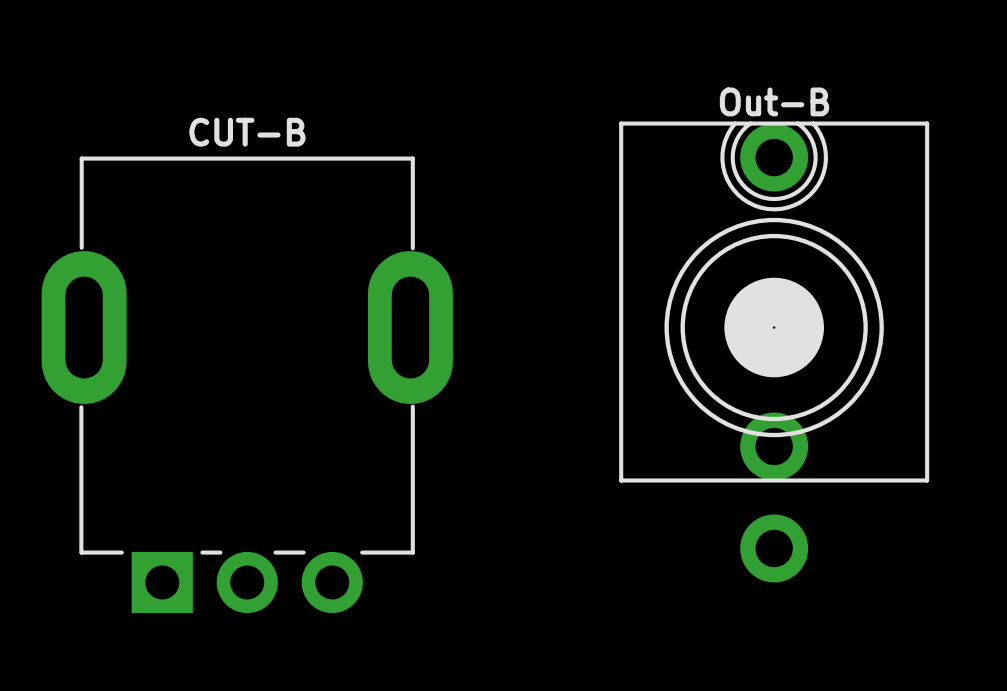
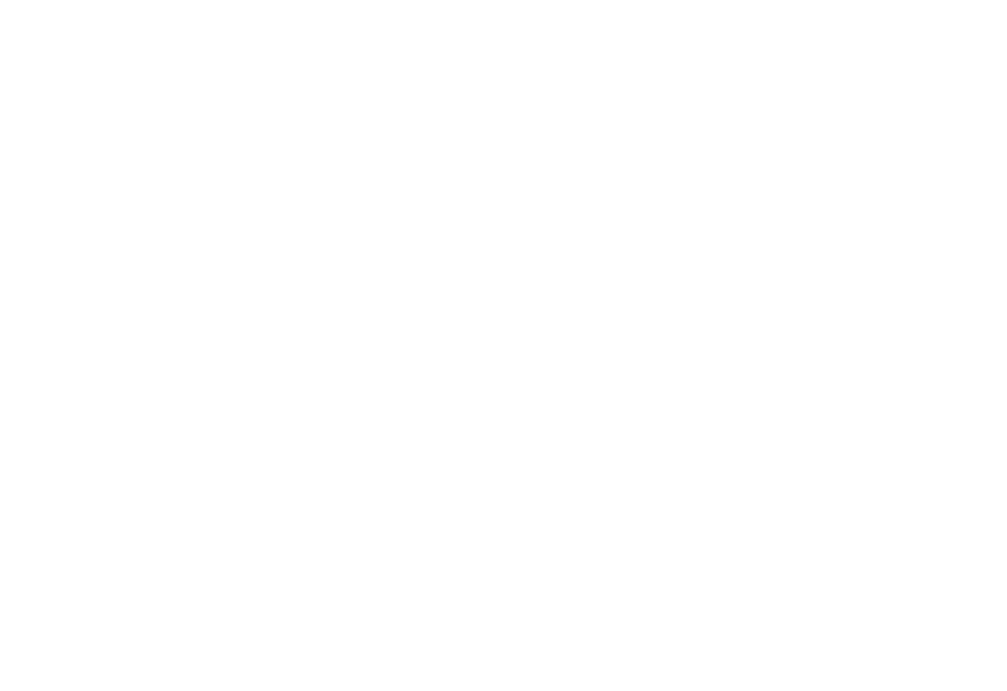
part: Out-B (774, 352) -> none
part: CUT-B (247, 384) -> none

